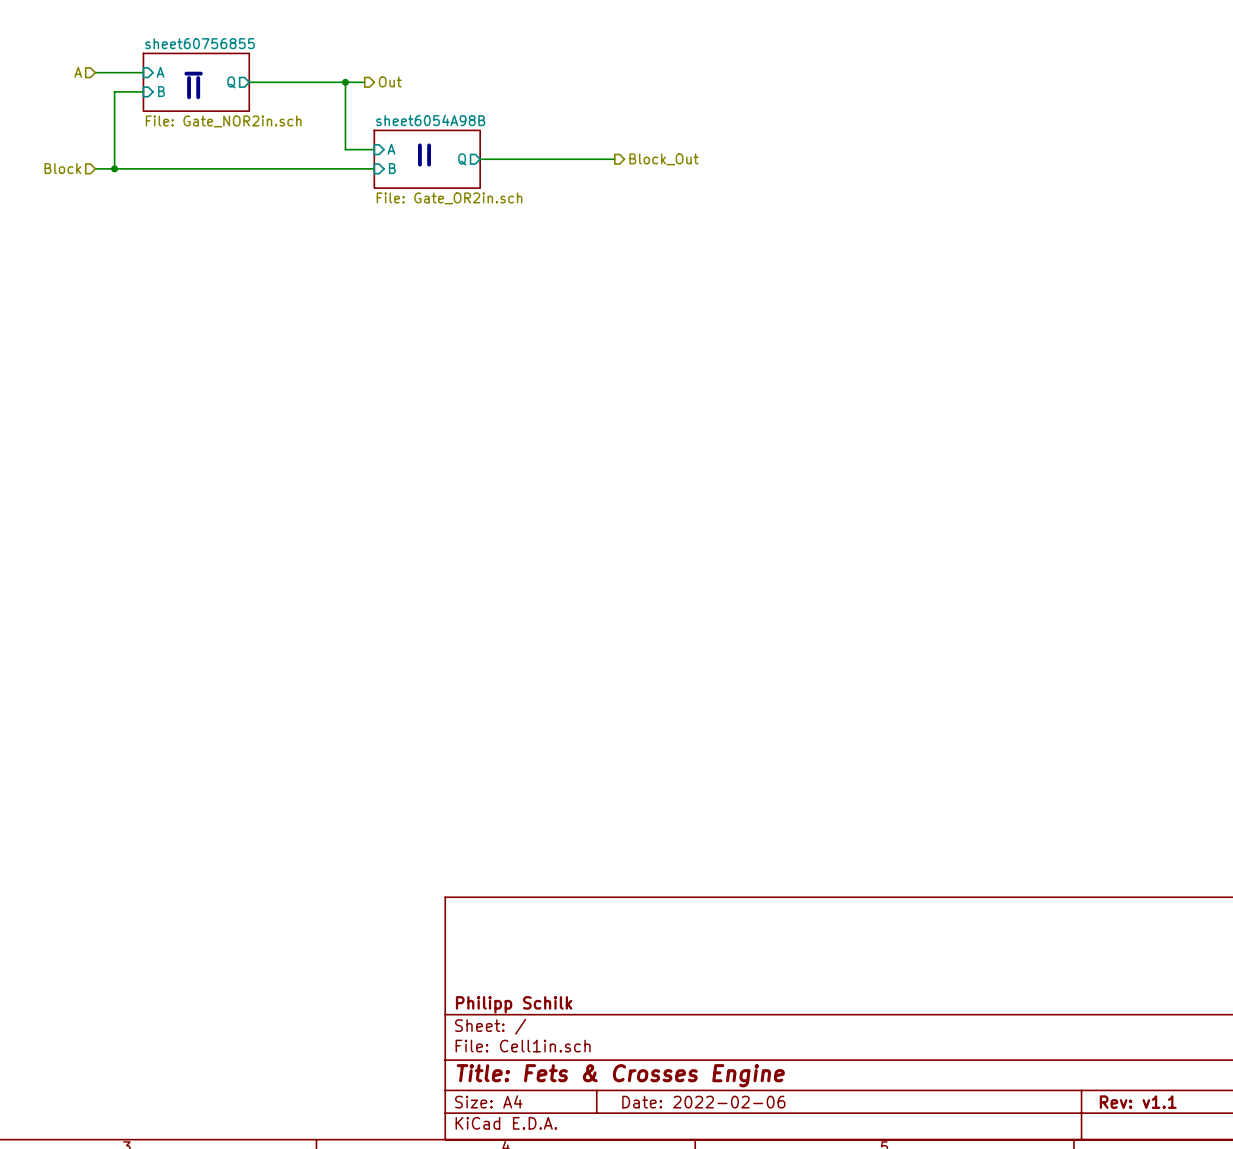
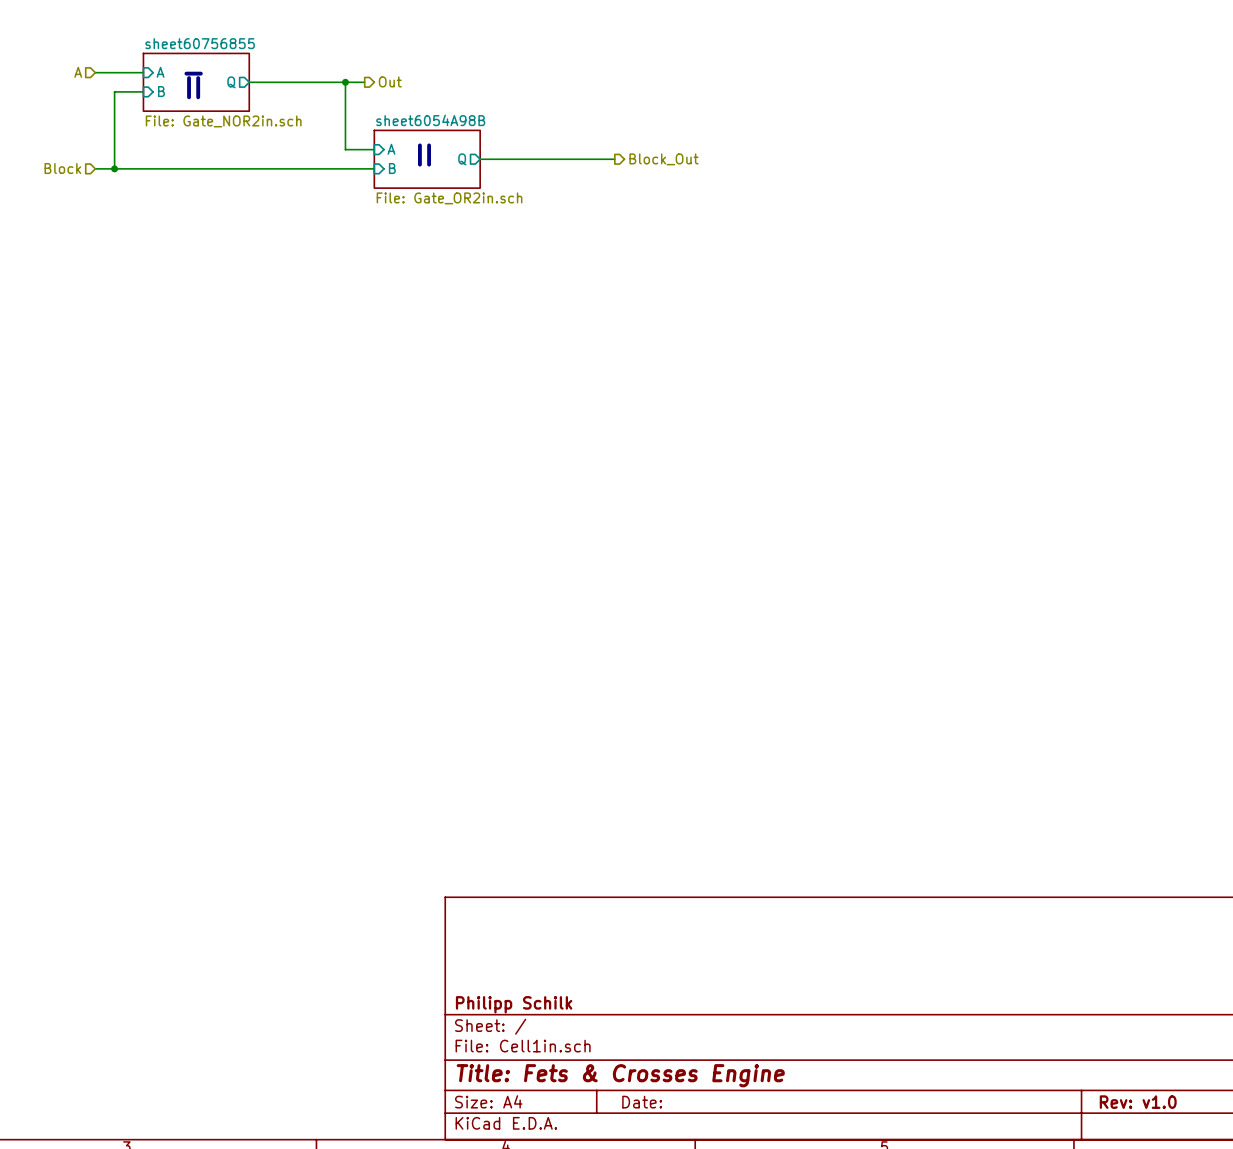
title block: Date: 2022-02-06 (703, 1102) -> Date: (642, 1102)
title block: Rev: v1.1 (1138, 1102) -> Rev: v1.0 (1138, 1102)

